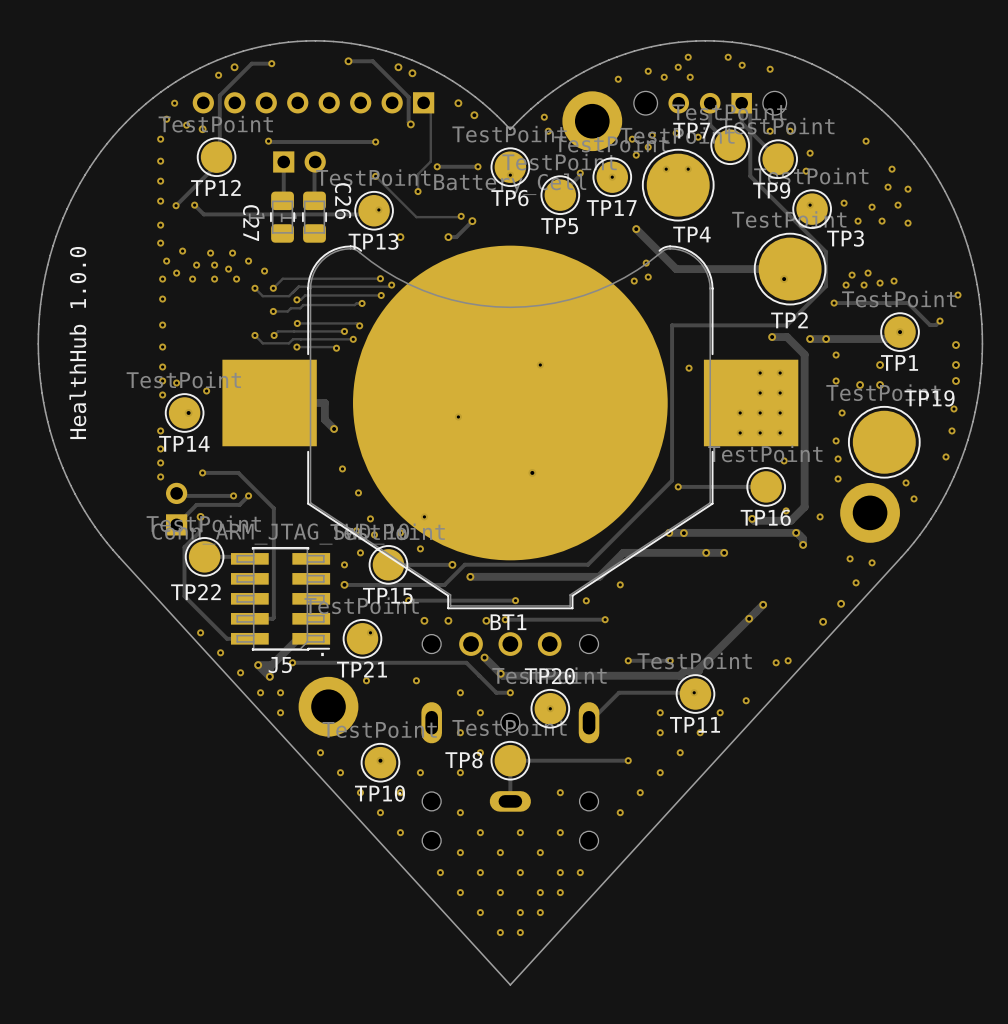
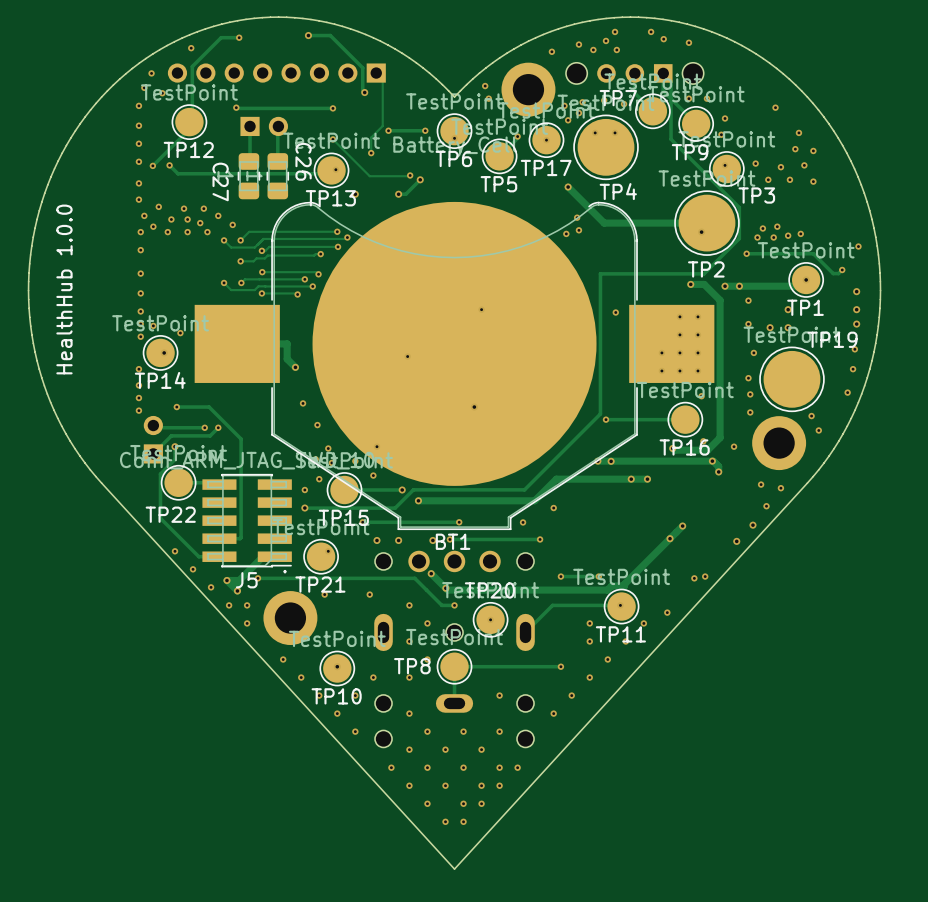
via: (234, 67) -> none
via: (398, 67) -> none
via: (412, 73) -> none
via: (458, 103) -> none
via: (474, 115) -> none
via: (202, 129) -> none

